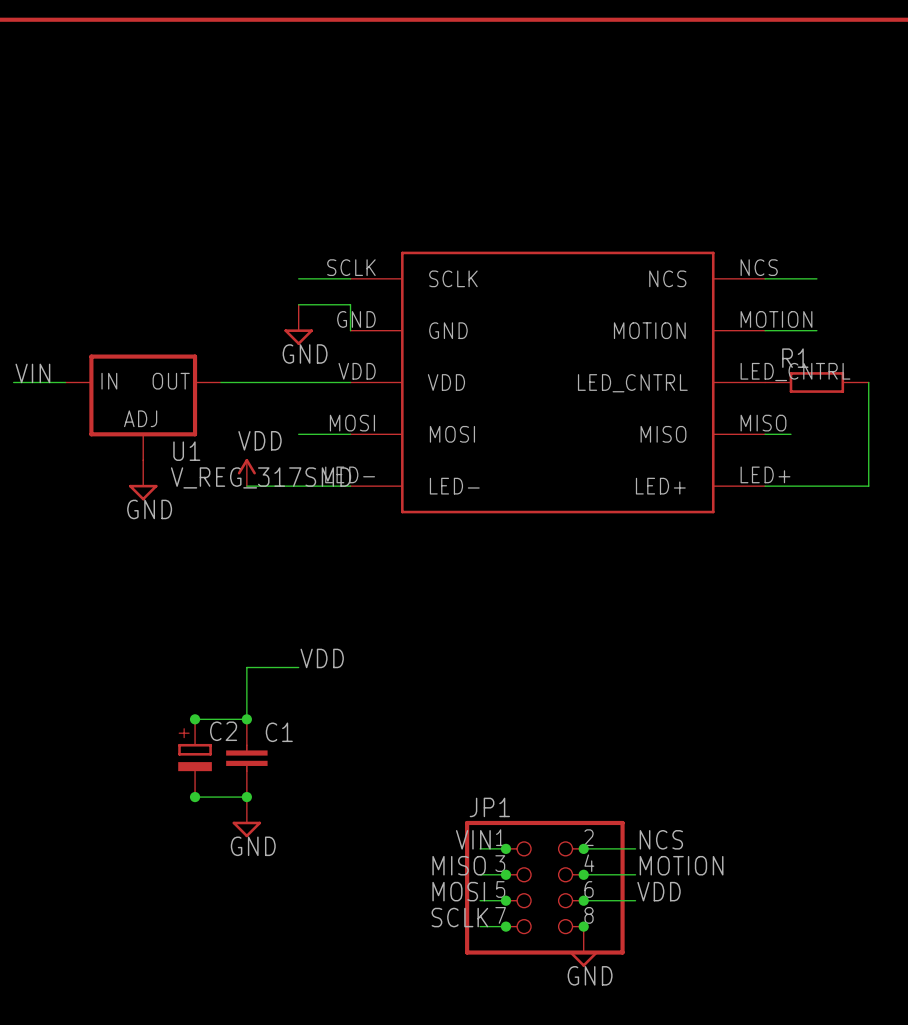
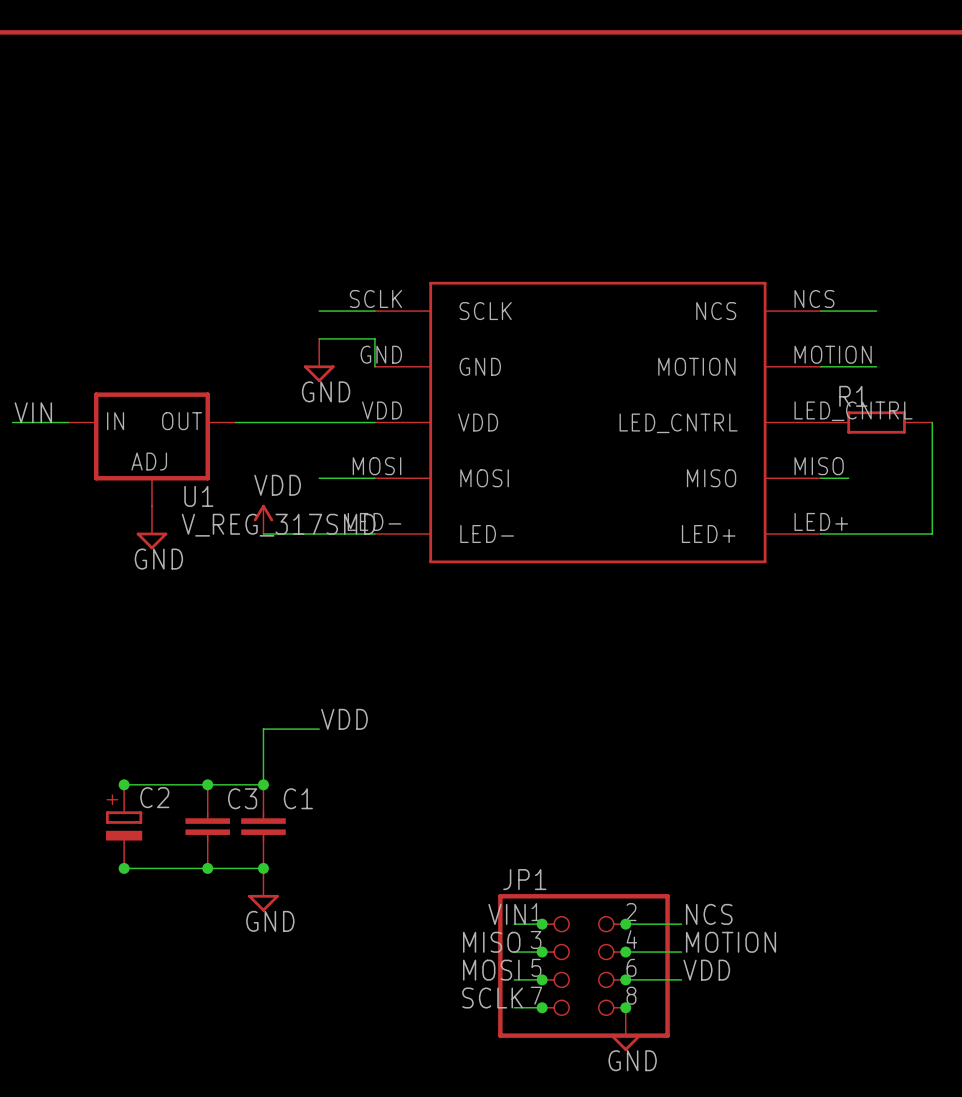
wire: none -> (124, 784) (207, 784)
junction: none -> (124, 784)
C2 position: (195, 758) -> (124, 826)
C3: none -> (207, 826)
wire: none -> (124, 868) (207, 868)
junction: none -> (124, 868)

